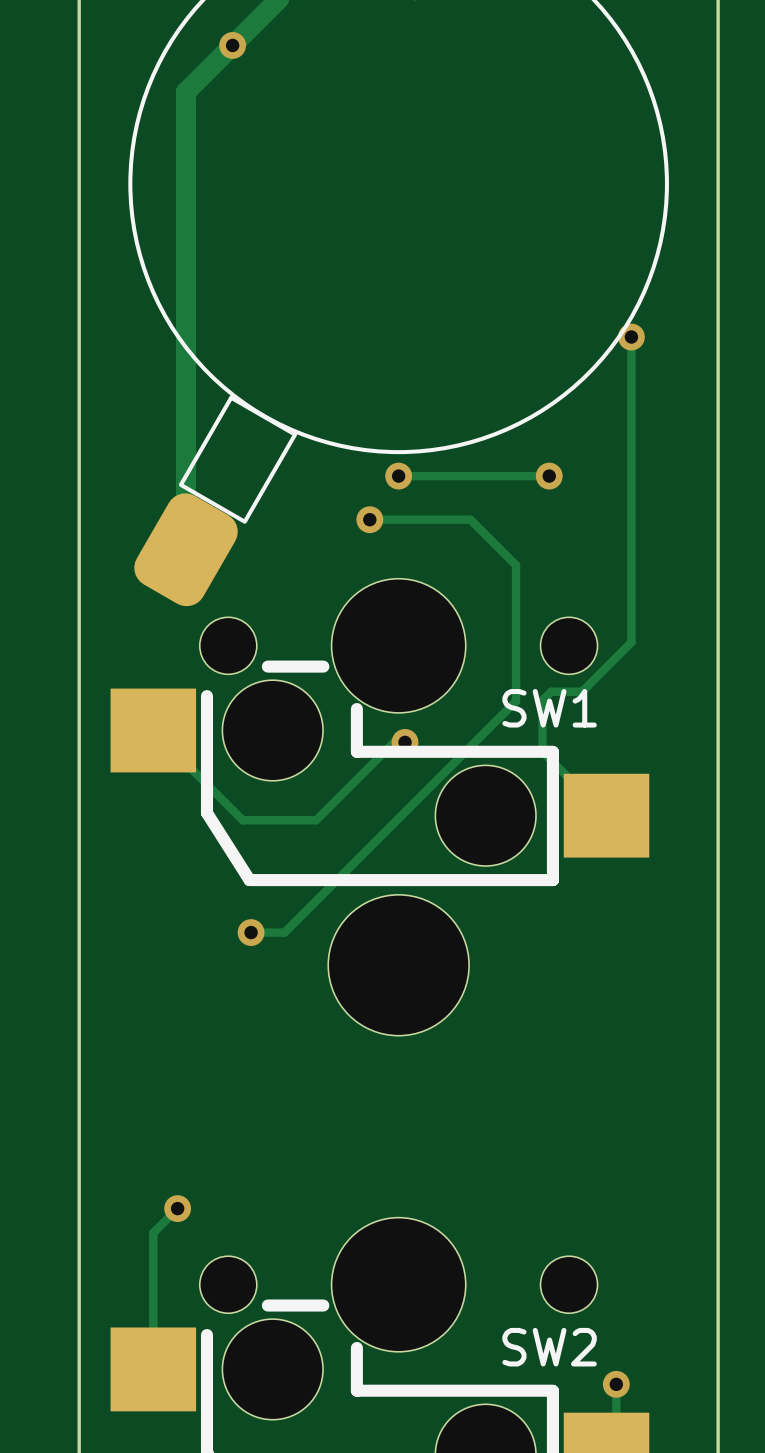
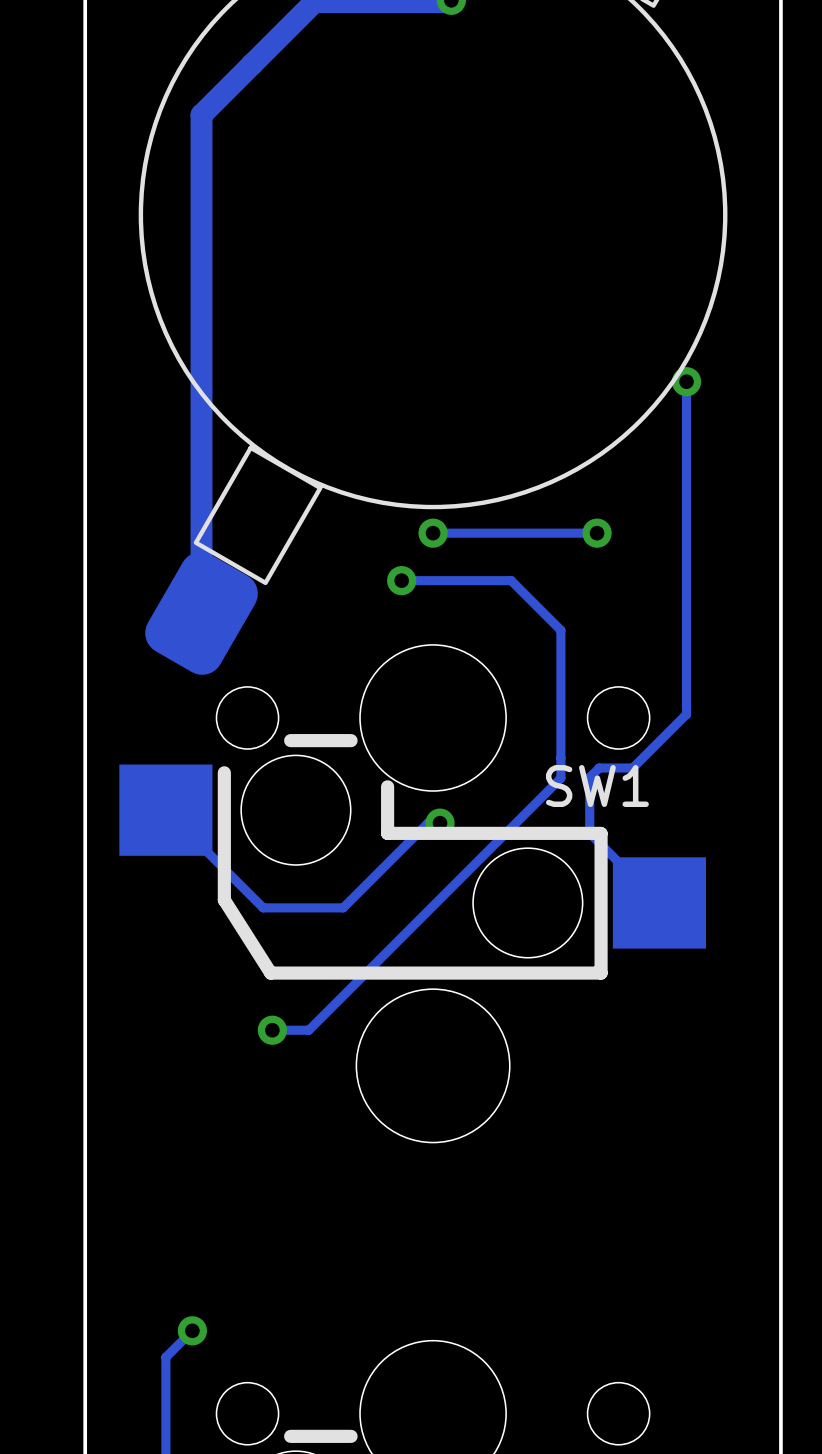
via: (232, 45) -> none

